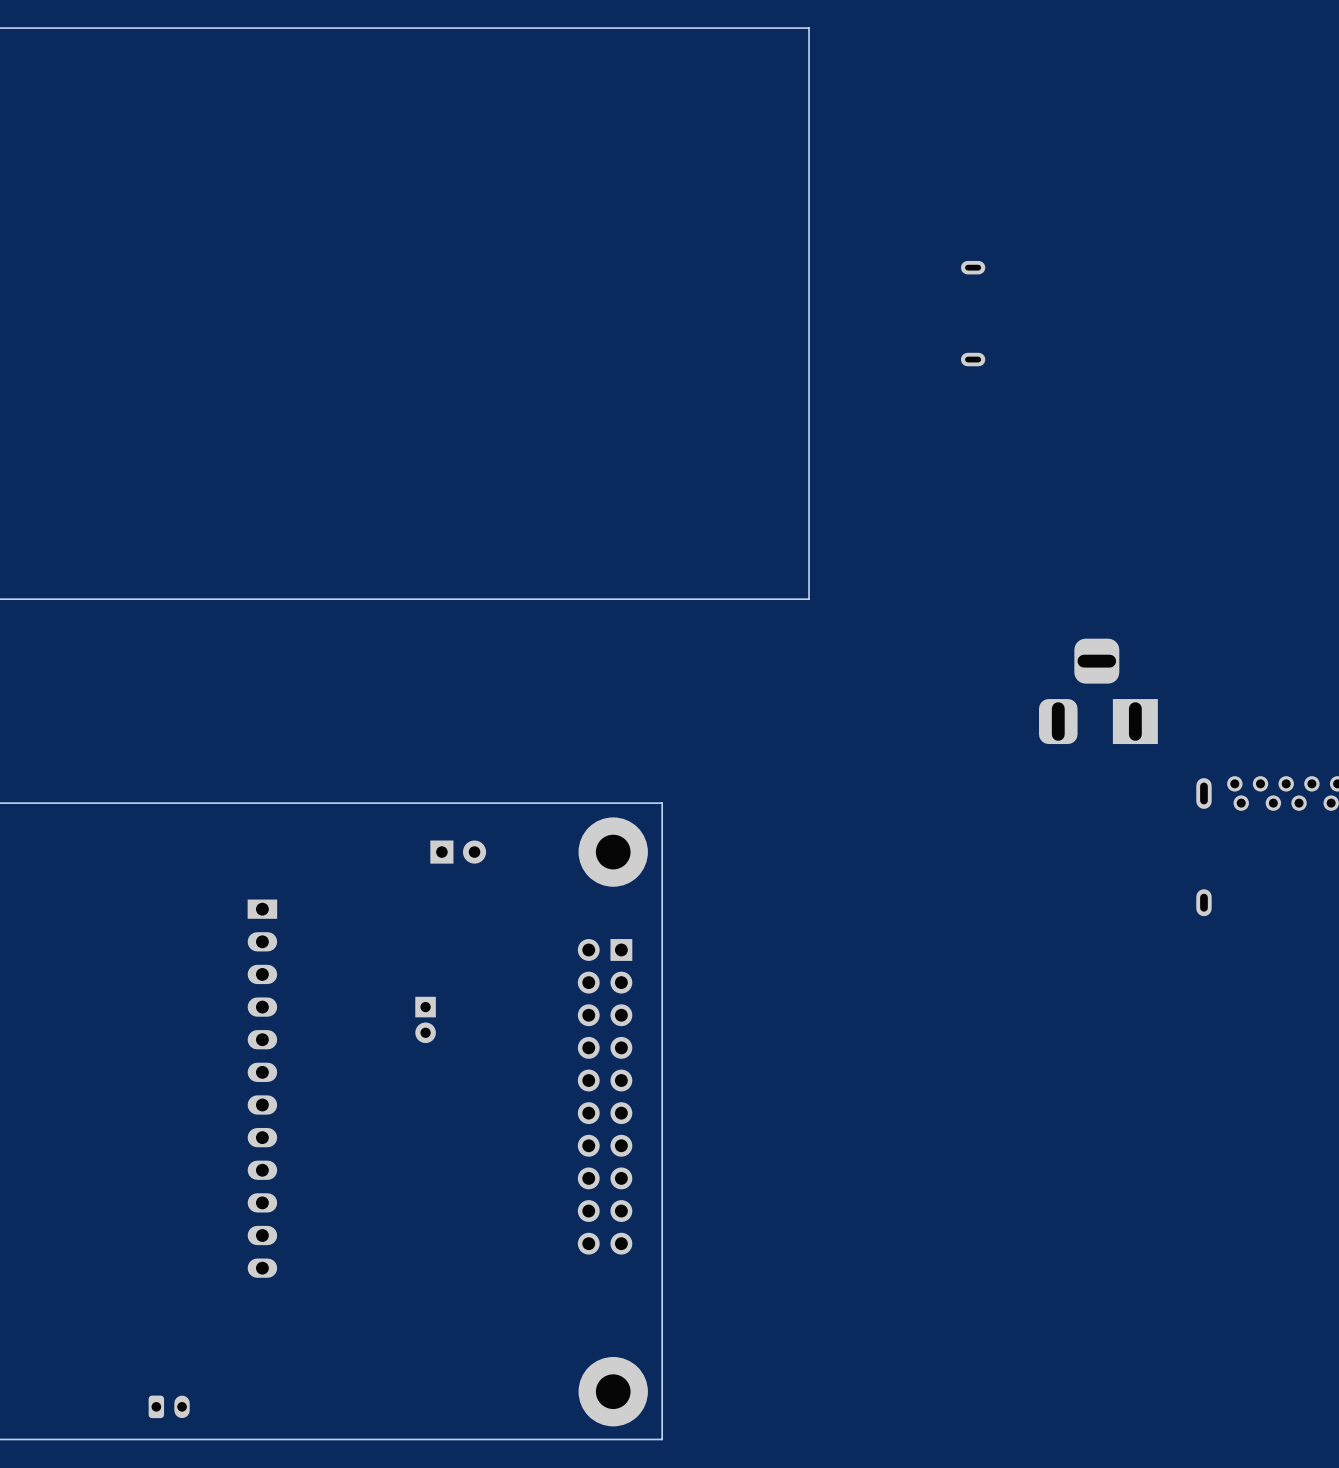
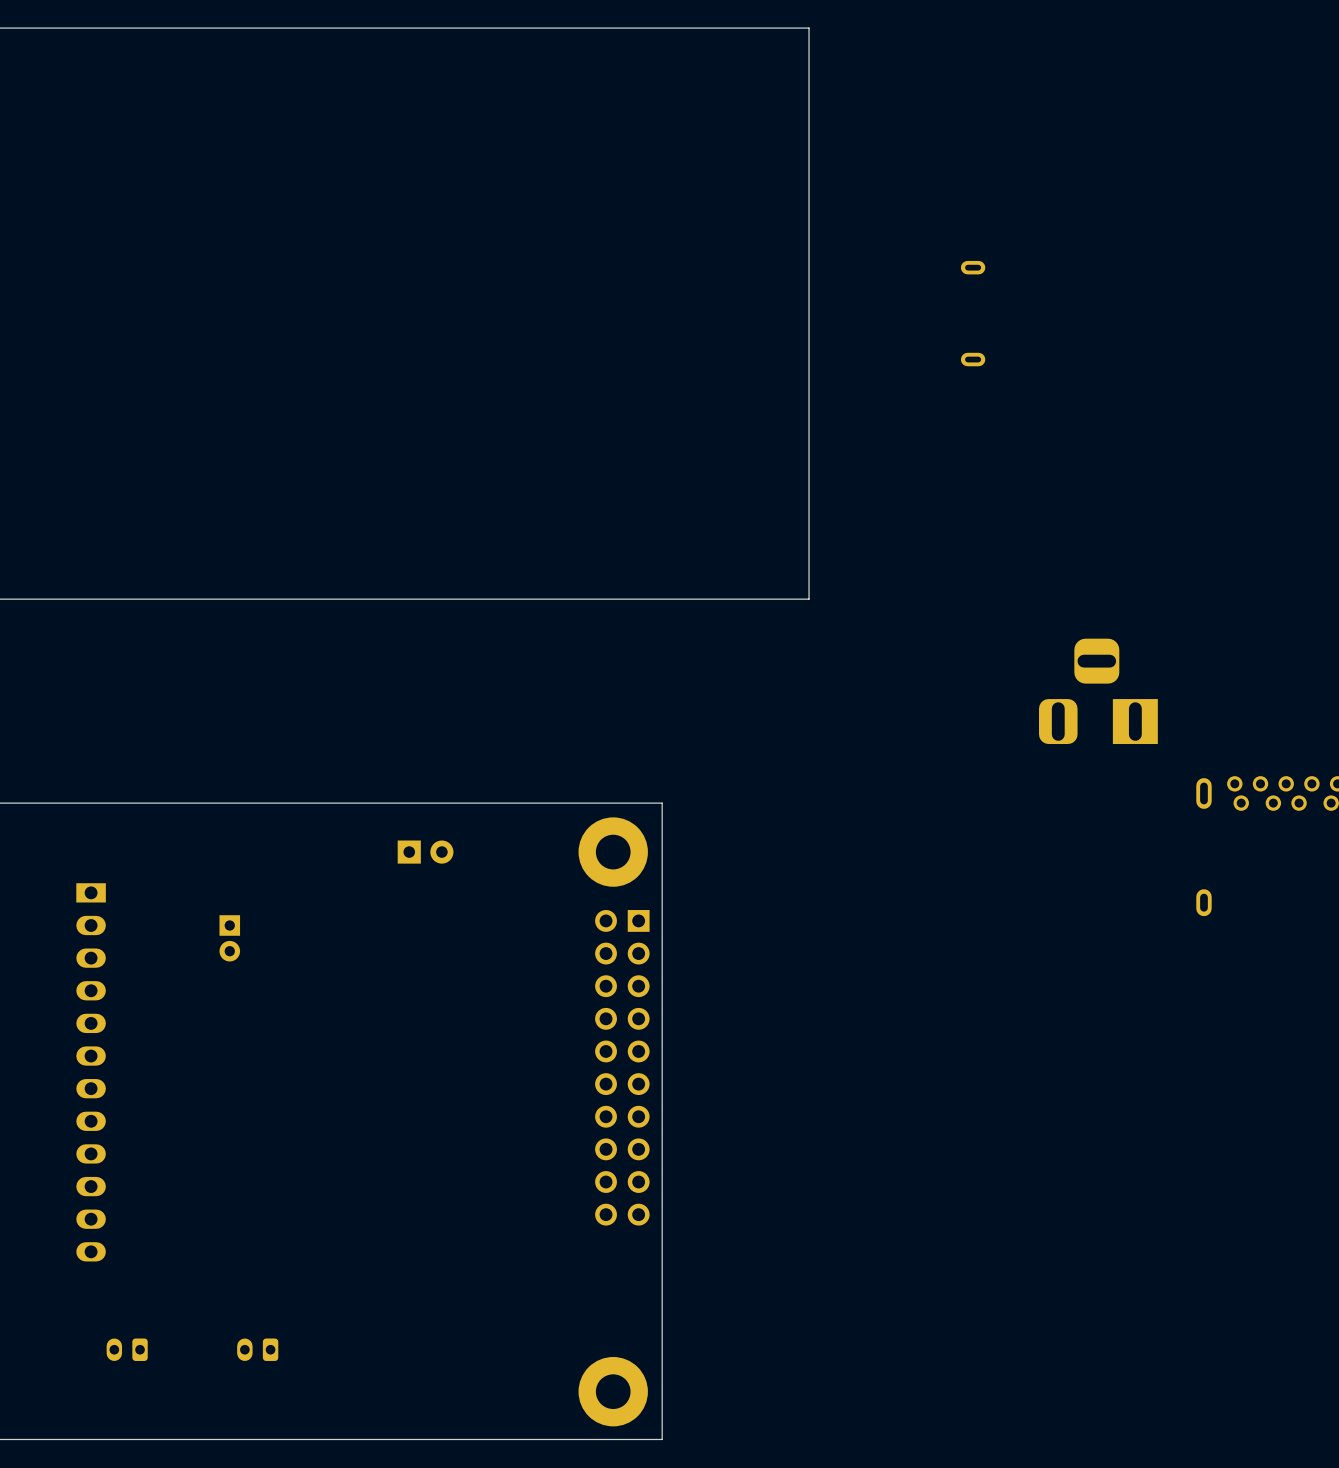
part position: (458, 852) -> (425, 852)
part position: (425, 1019) -> (229, 938)
part position: (262, 1088) -> (91, 1072)
part position: (605, 1096) -> (622, 1067)
part: none -> (127, 1349)
part: none -> (257, 1349)
part: (169, 1406) -> none

